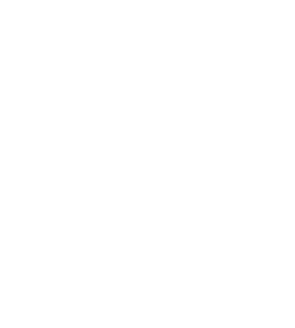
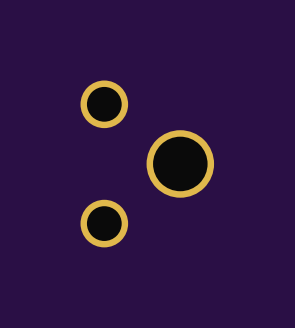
part: none -> (147, 163)

